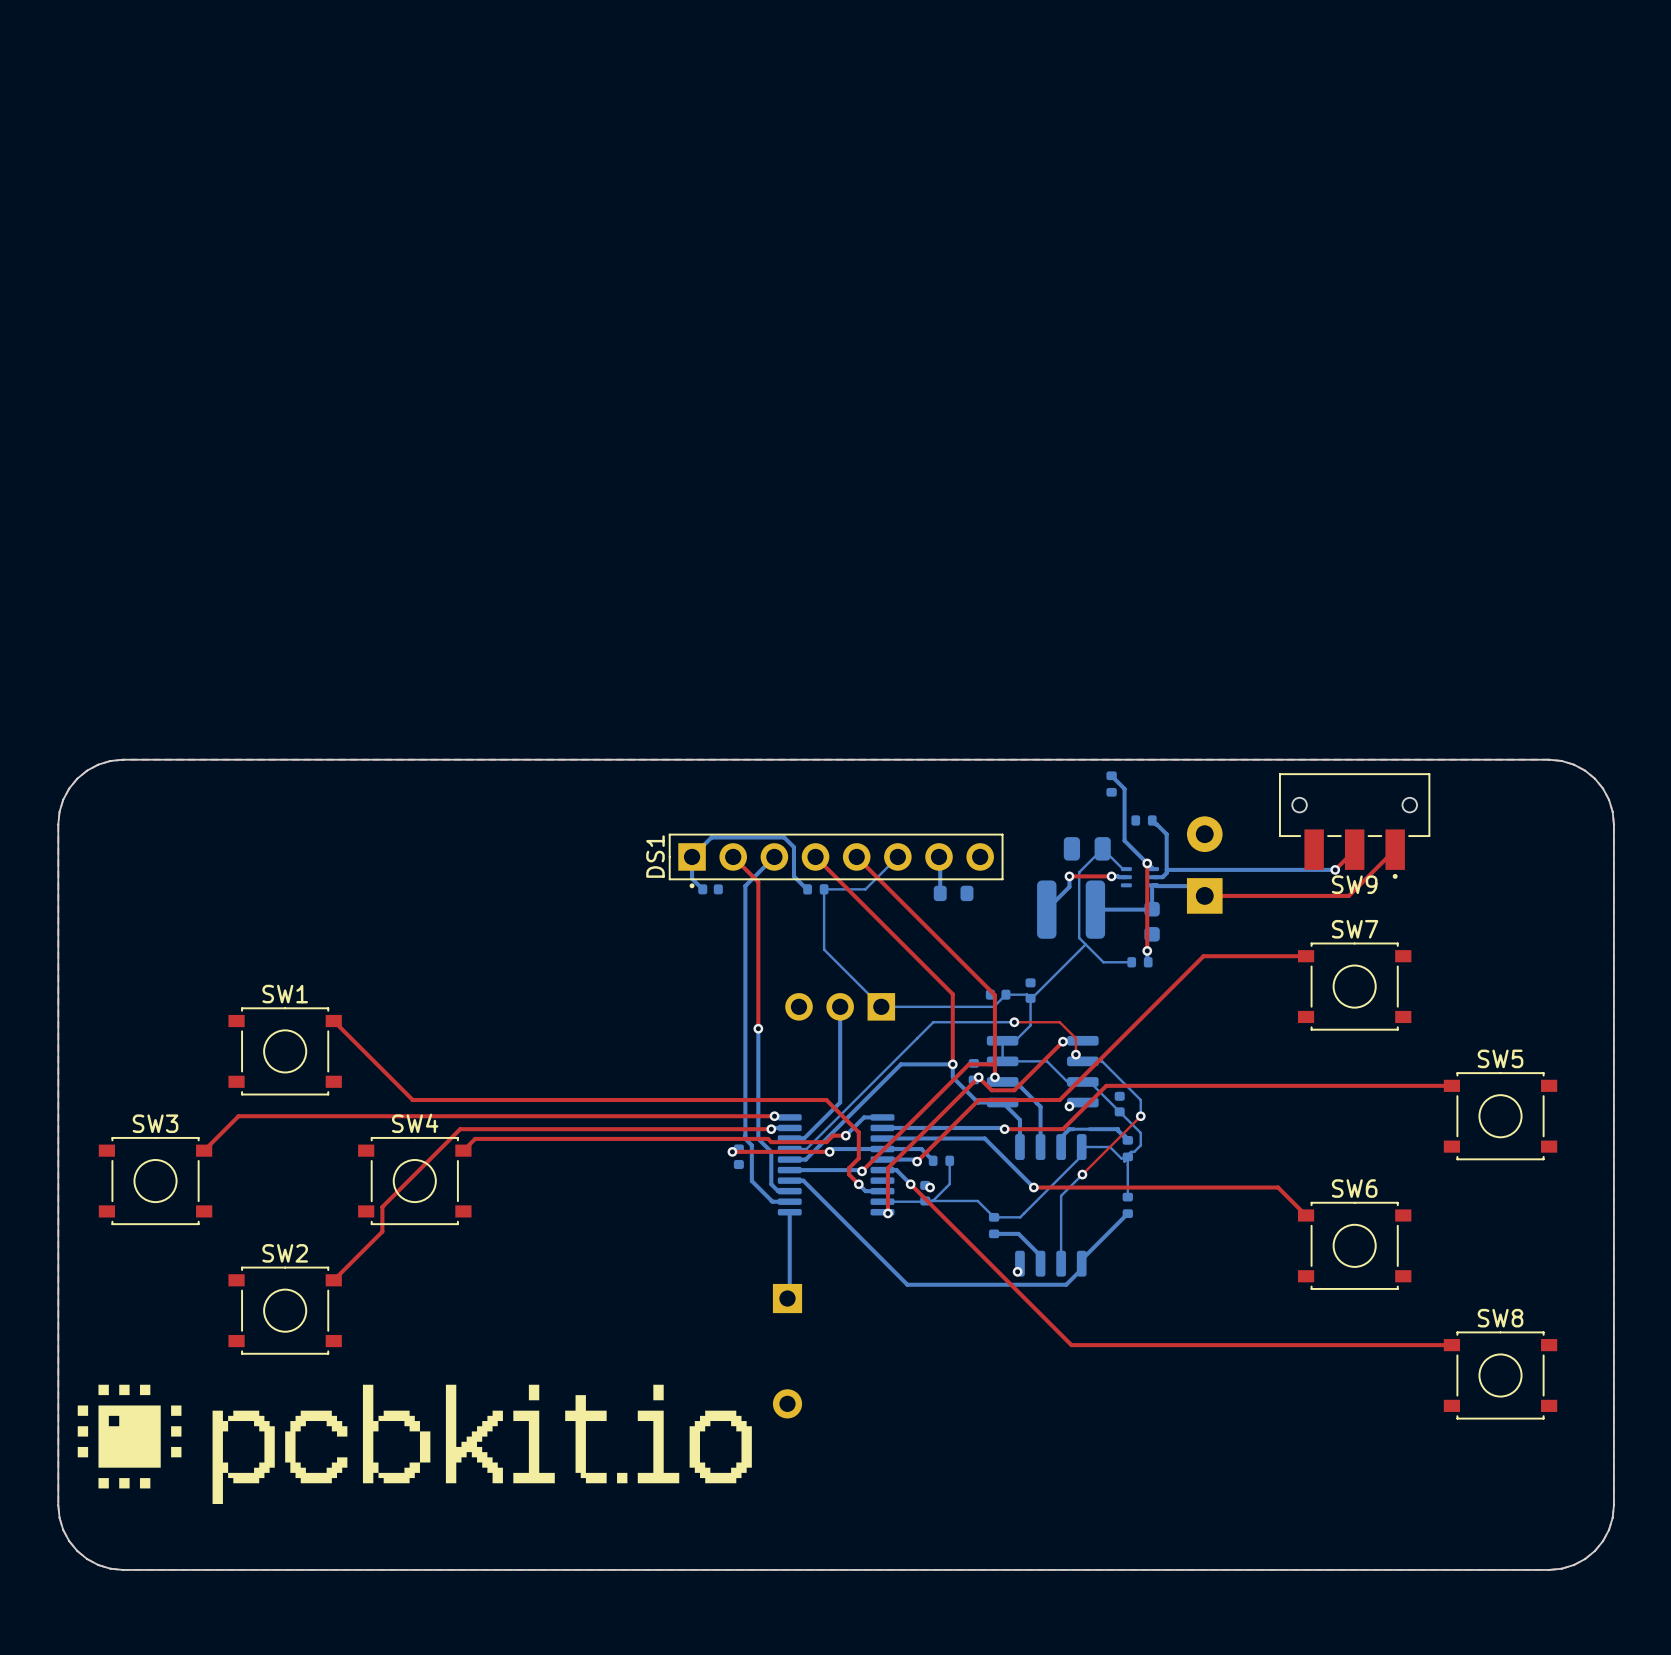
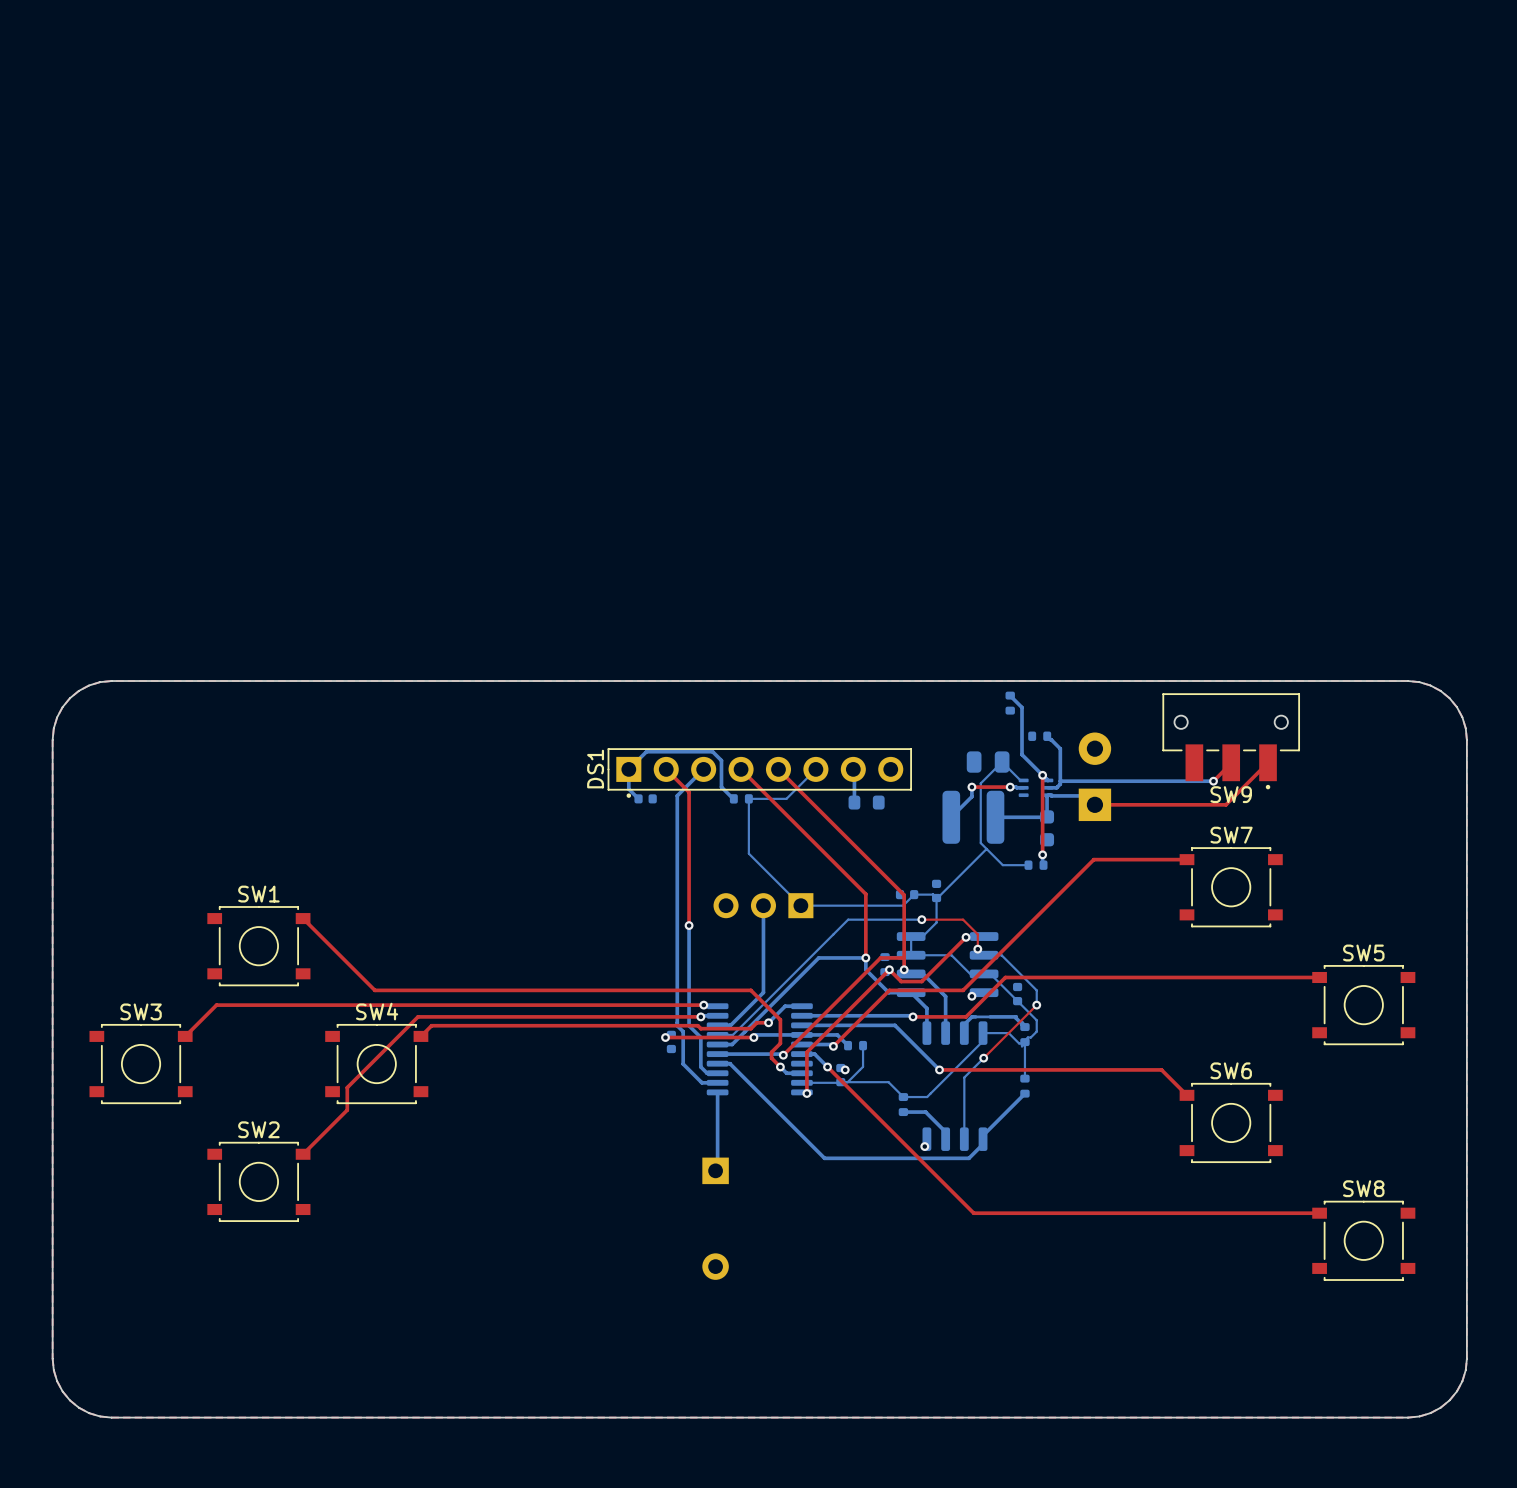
drawing: [77, 1384, 752, 1505] -> none

